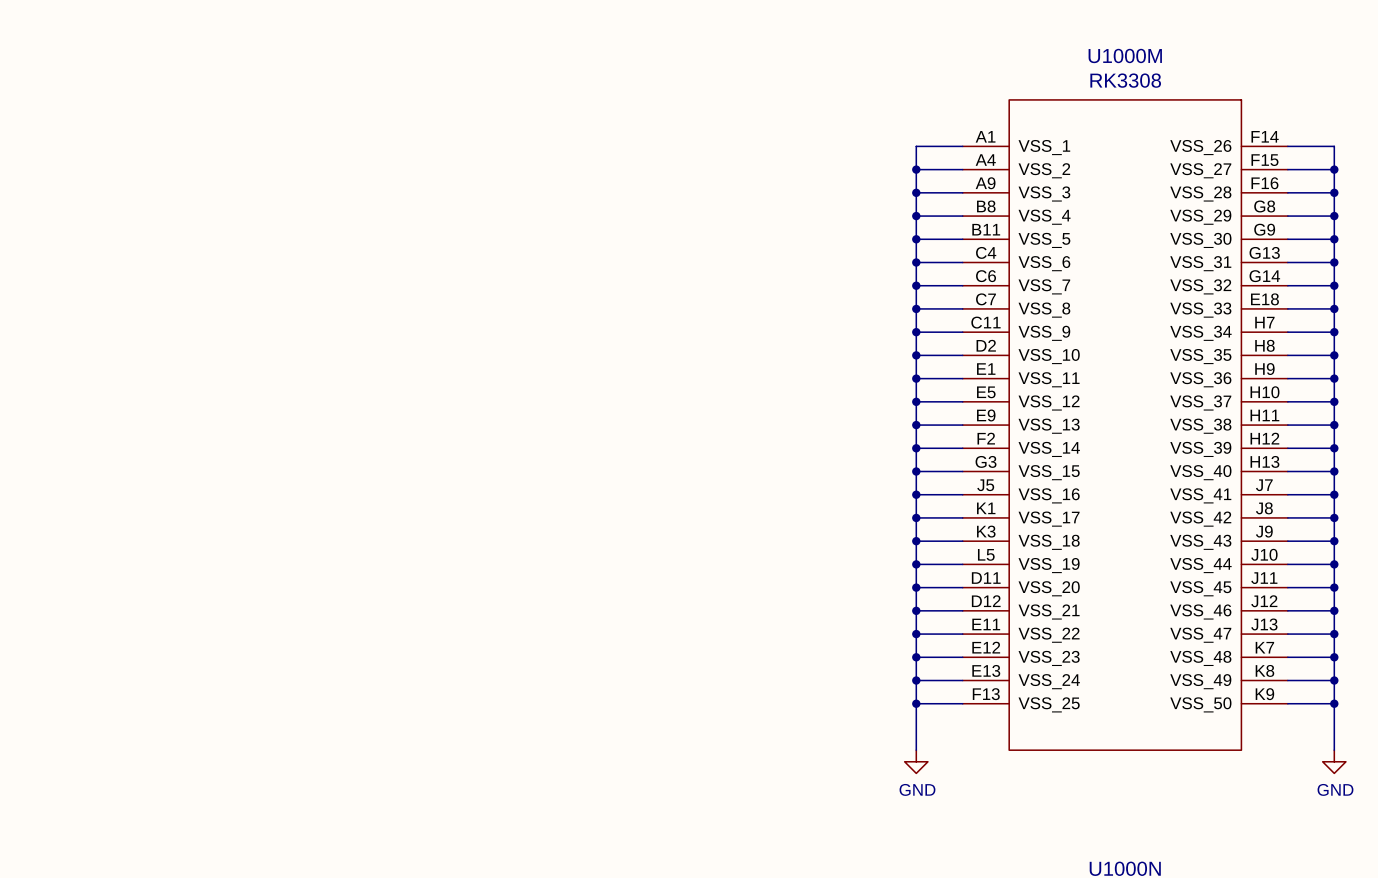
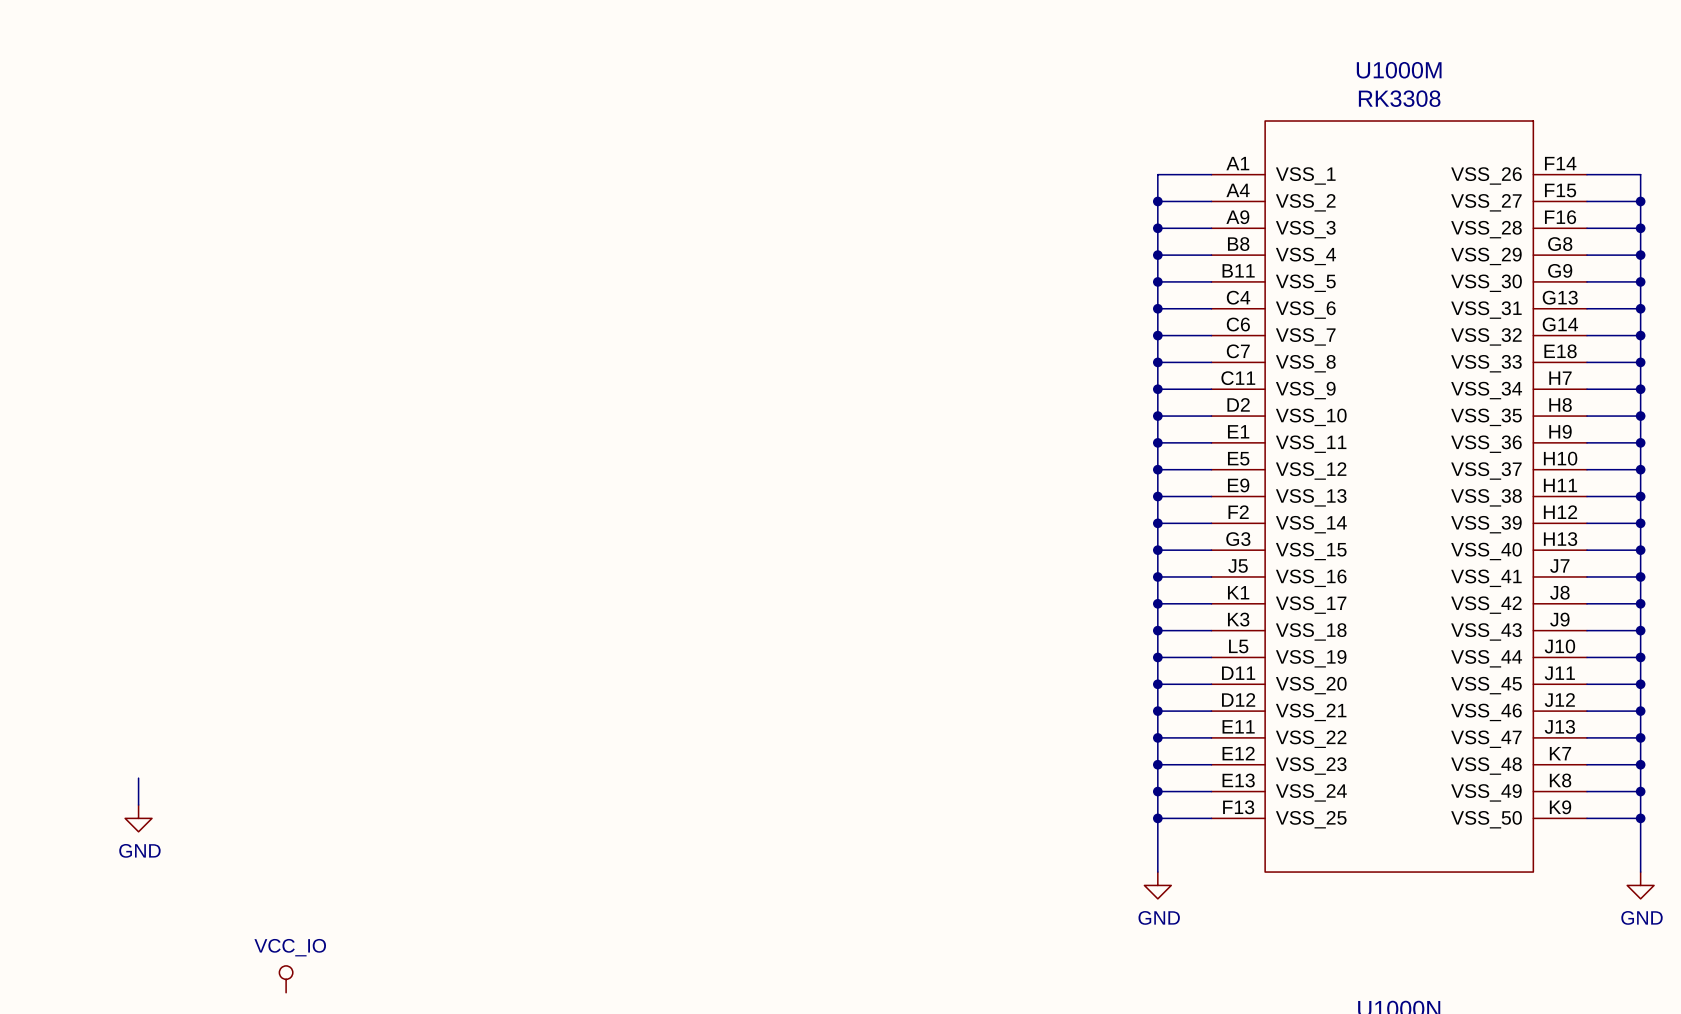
wire: none -> (138, 778) (138, 804)
power symbol: none -> GND (138, 818)
power symbol: none -> VCC_IO (286, 979)

